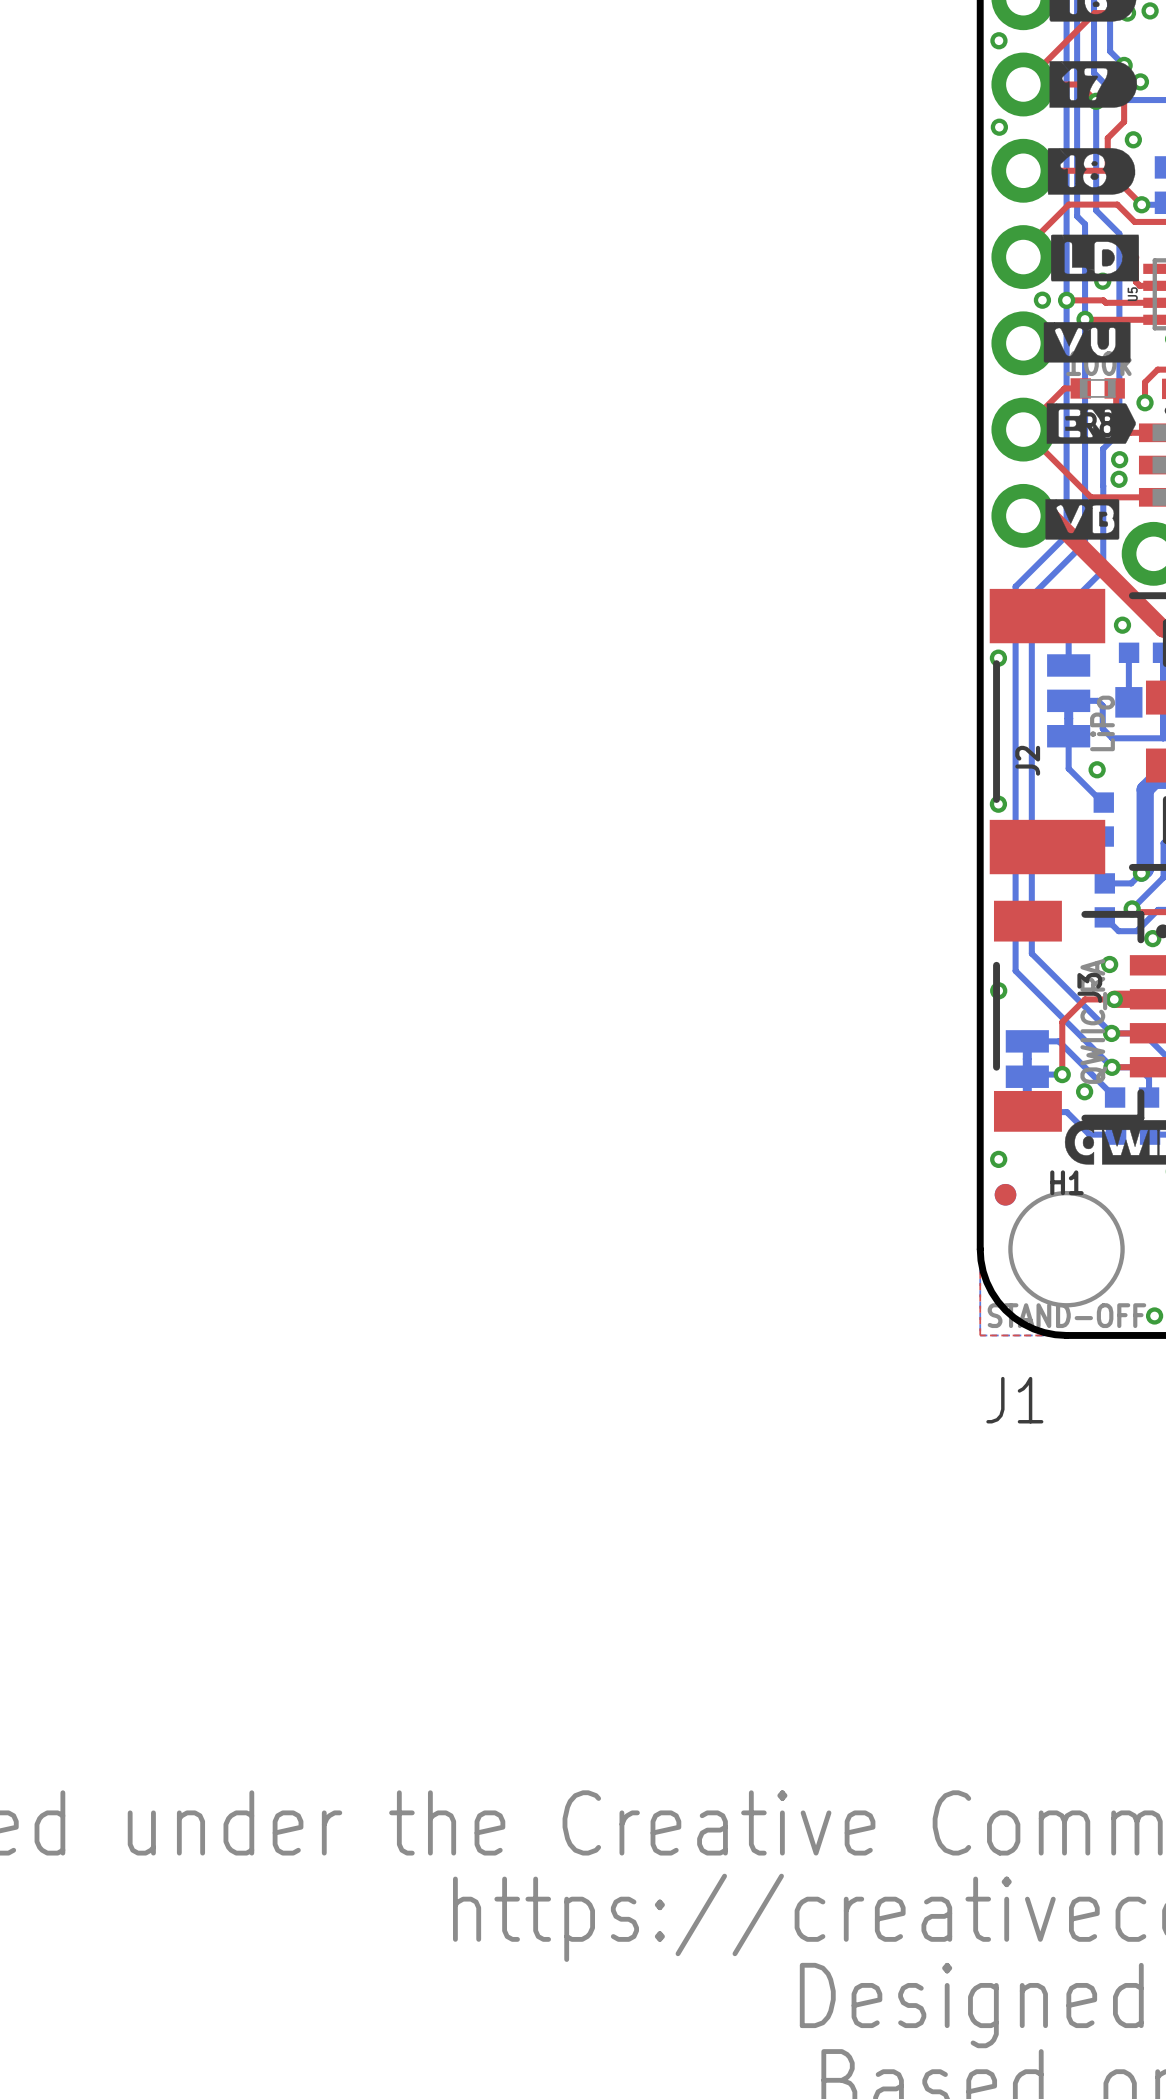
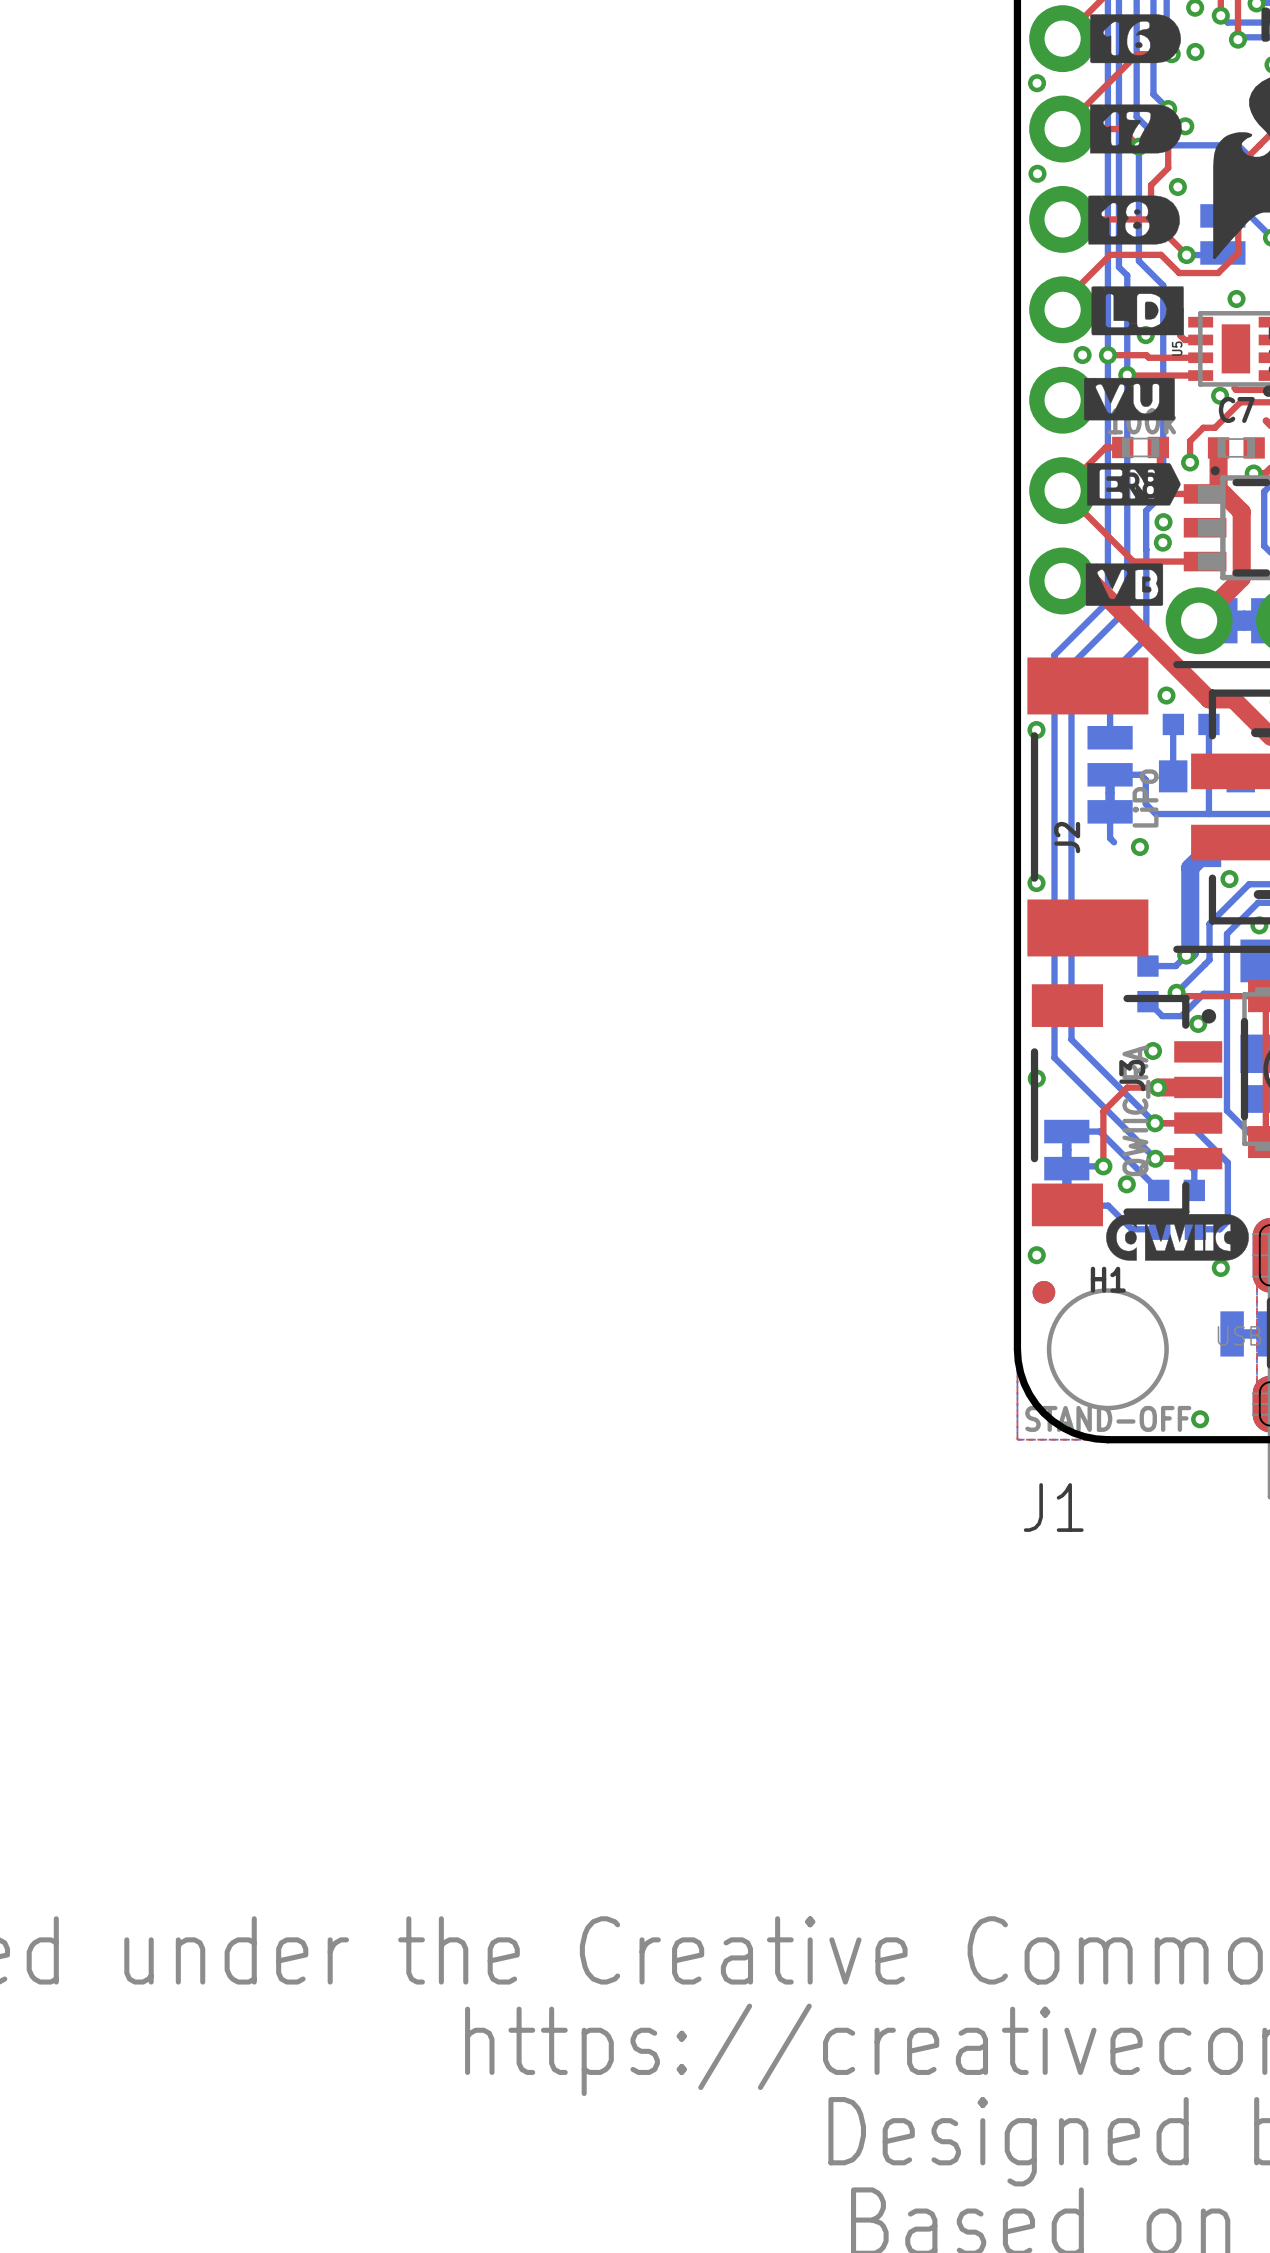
bottom track: (1068, 761) (1068, 768) (1103, 802) -> (1110, 838) (1114, 842)
part: (1103, 819) -> none

